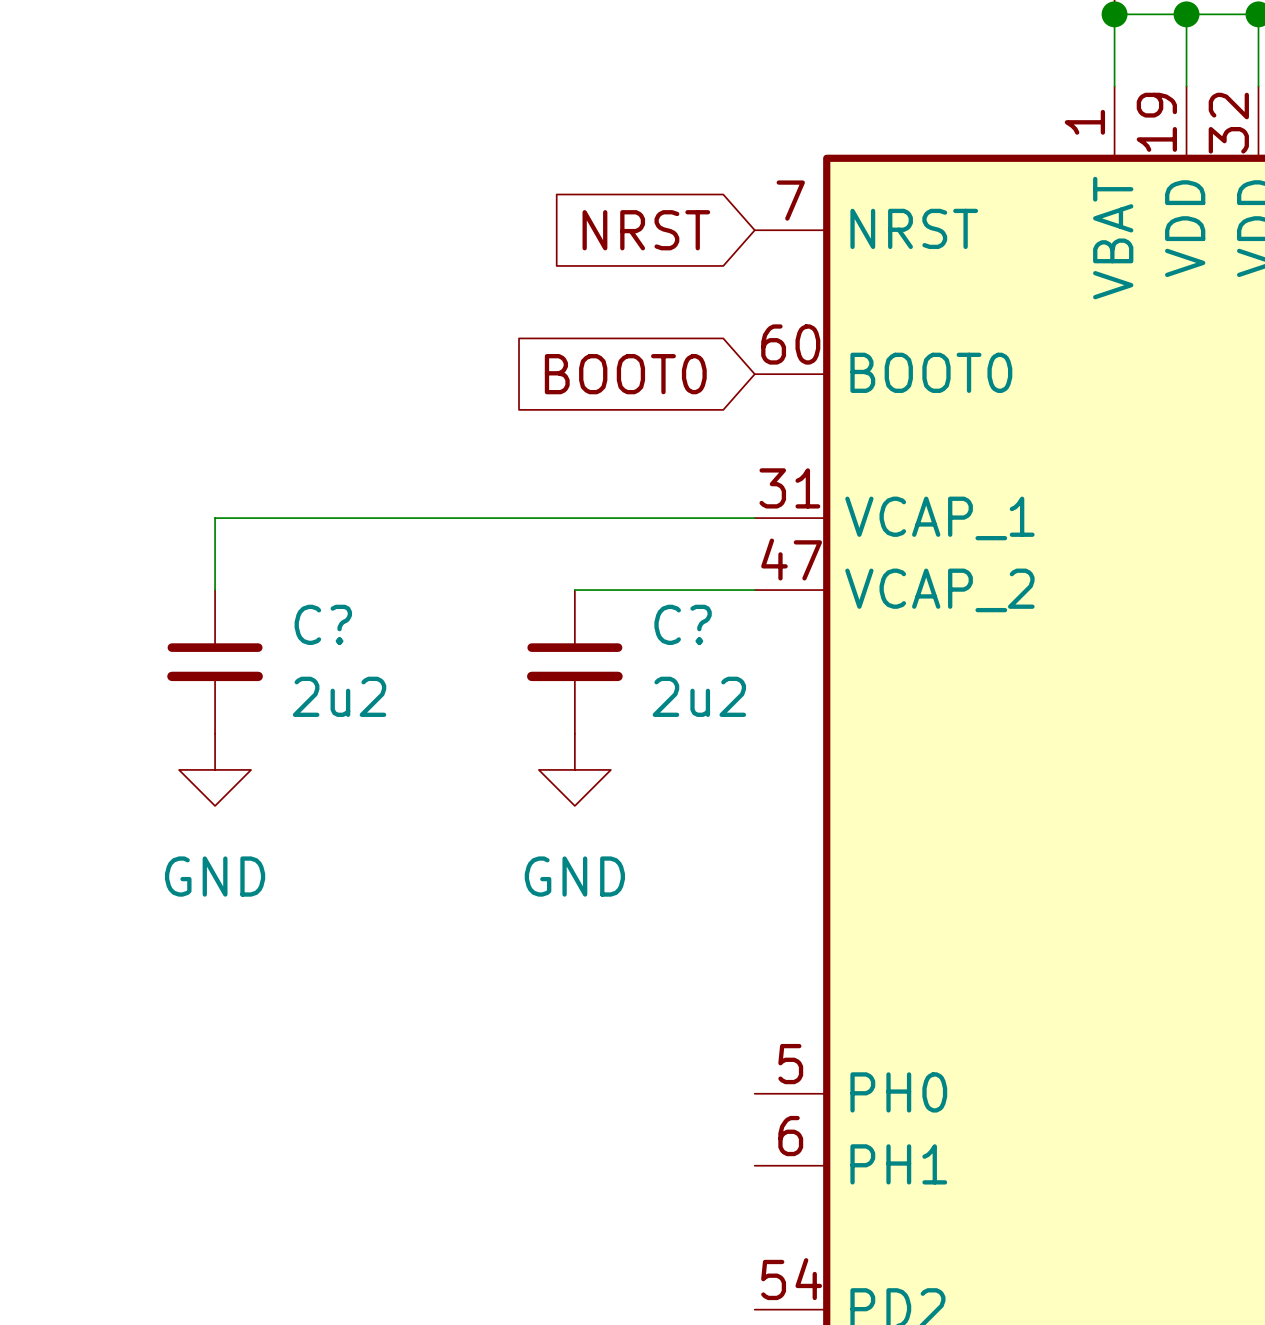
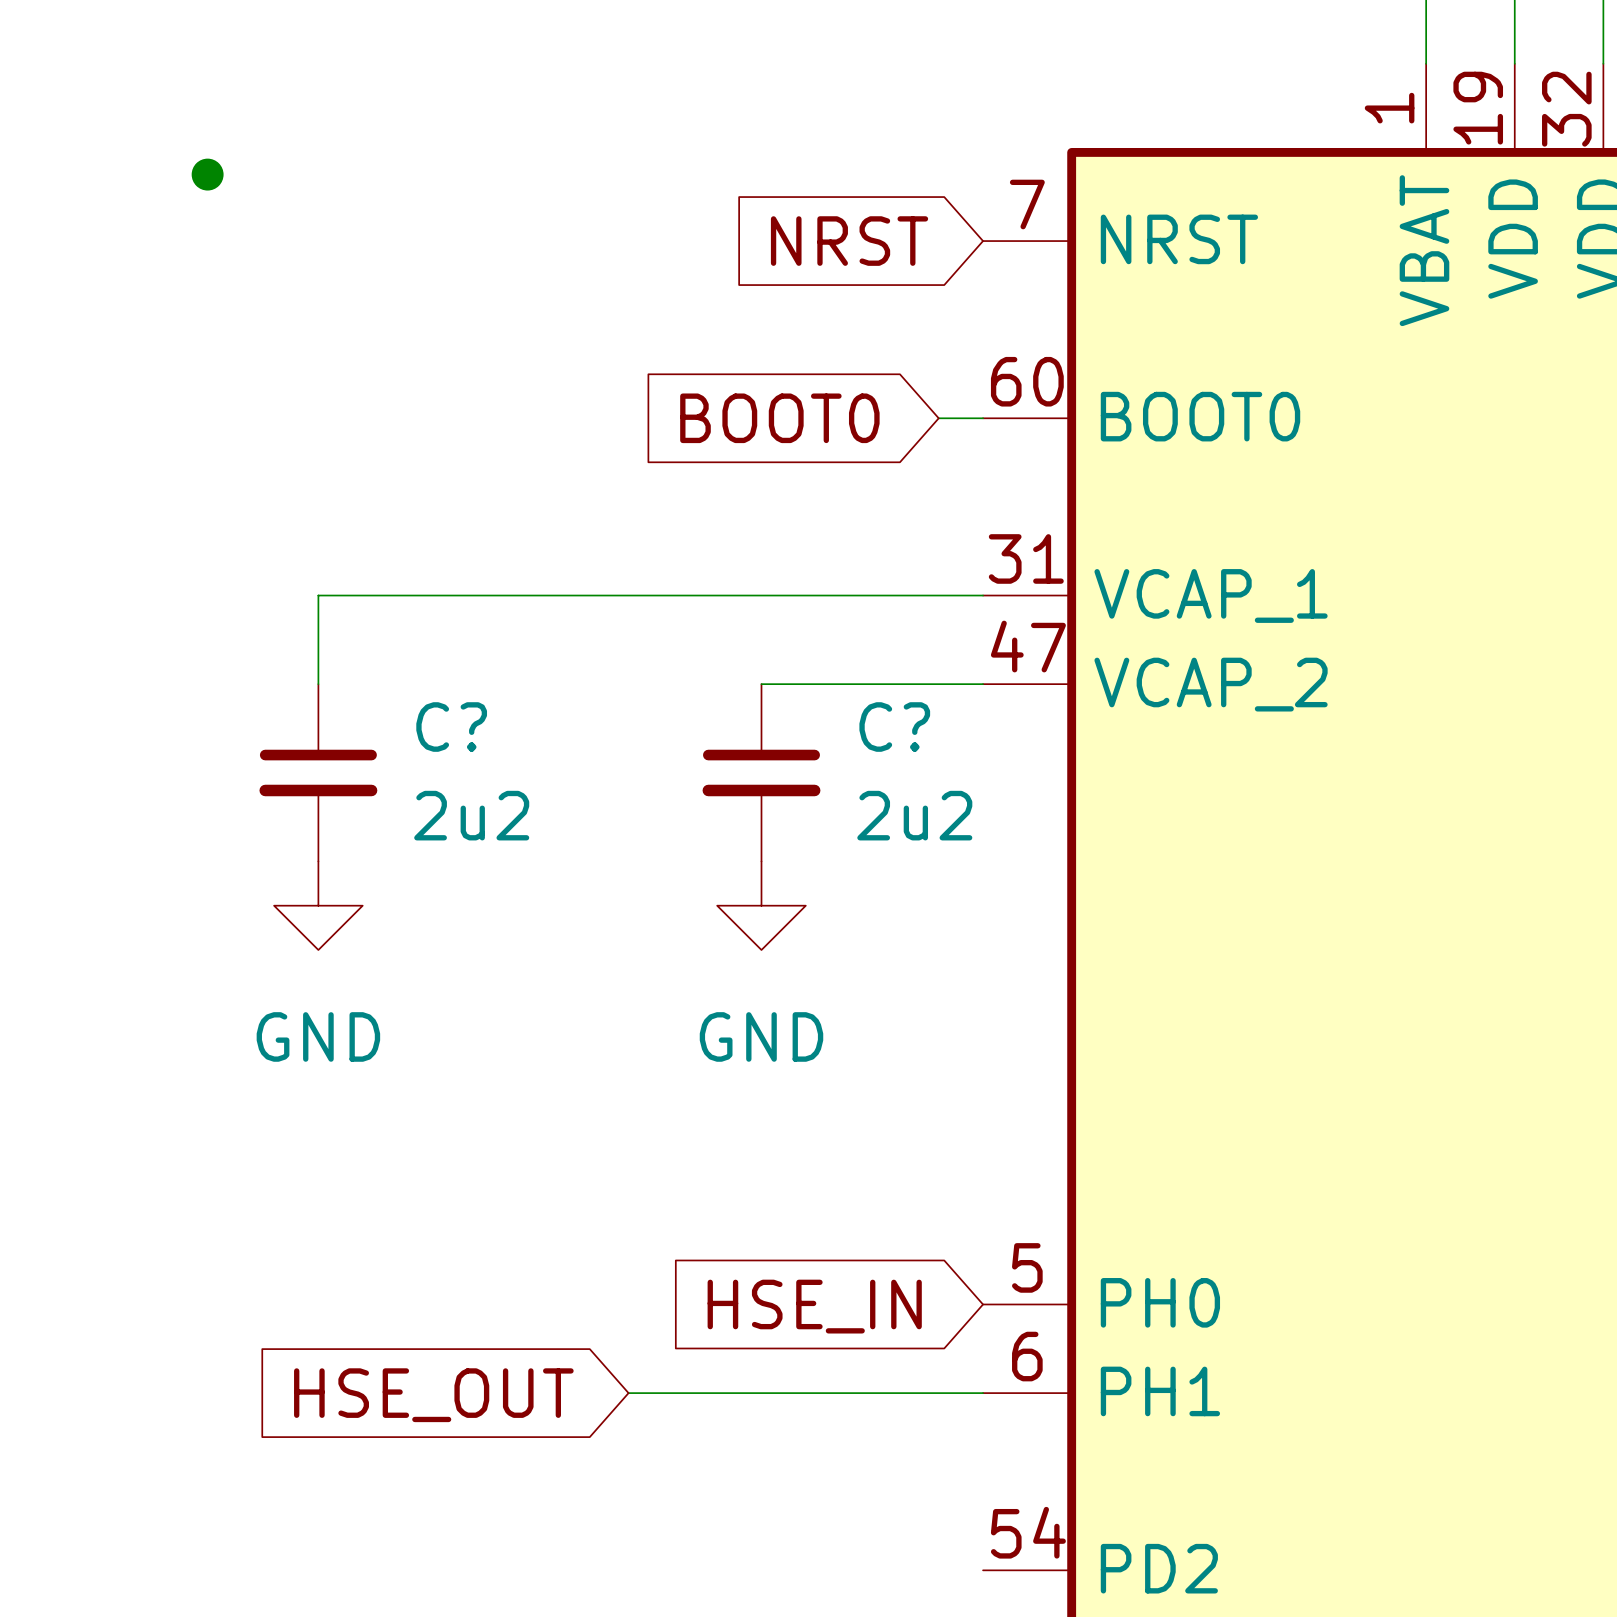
junction: none -> (207, 174)
global label position: BOOT0 (625, 374) -> BOOT0 (779, 418)
wire: none -> (938, 418) (983, 418)
global label: none -> HSE_IN (814, 1306)
wire: none -> (628, 1393) (983, 1393)
global label: none -> HSE_OUT (433, 1395)

